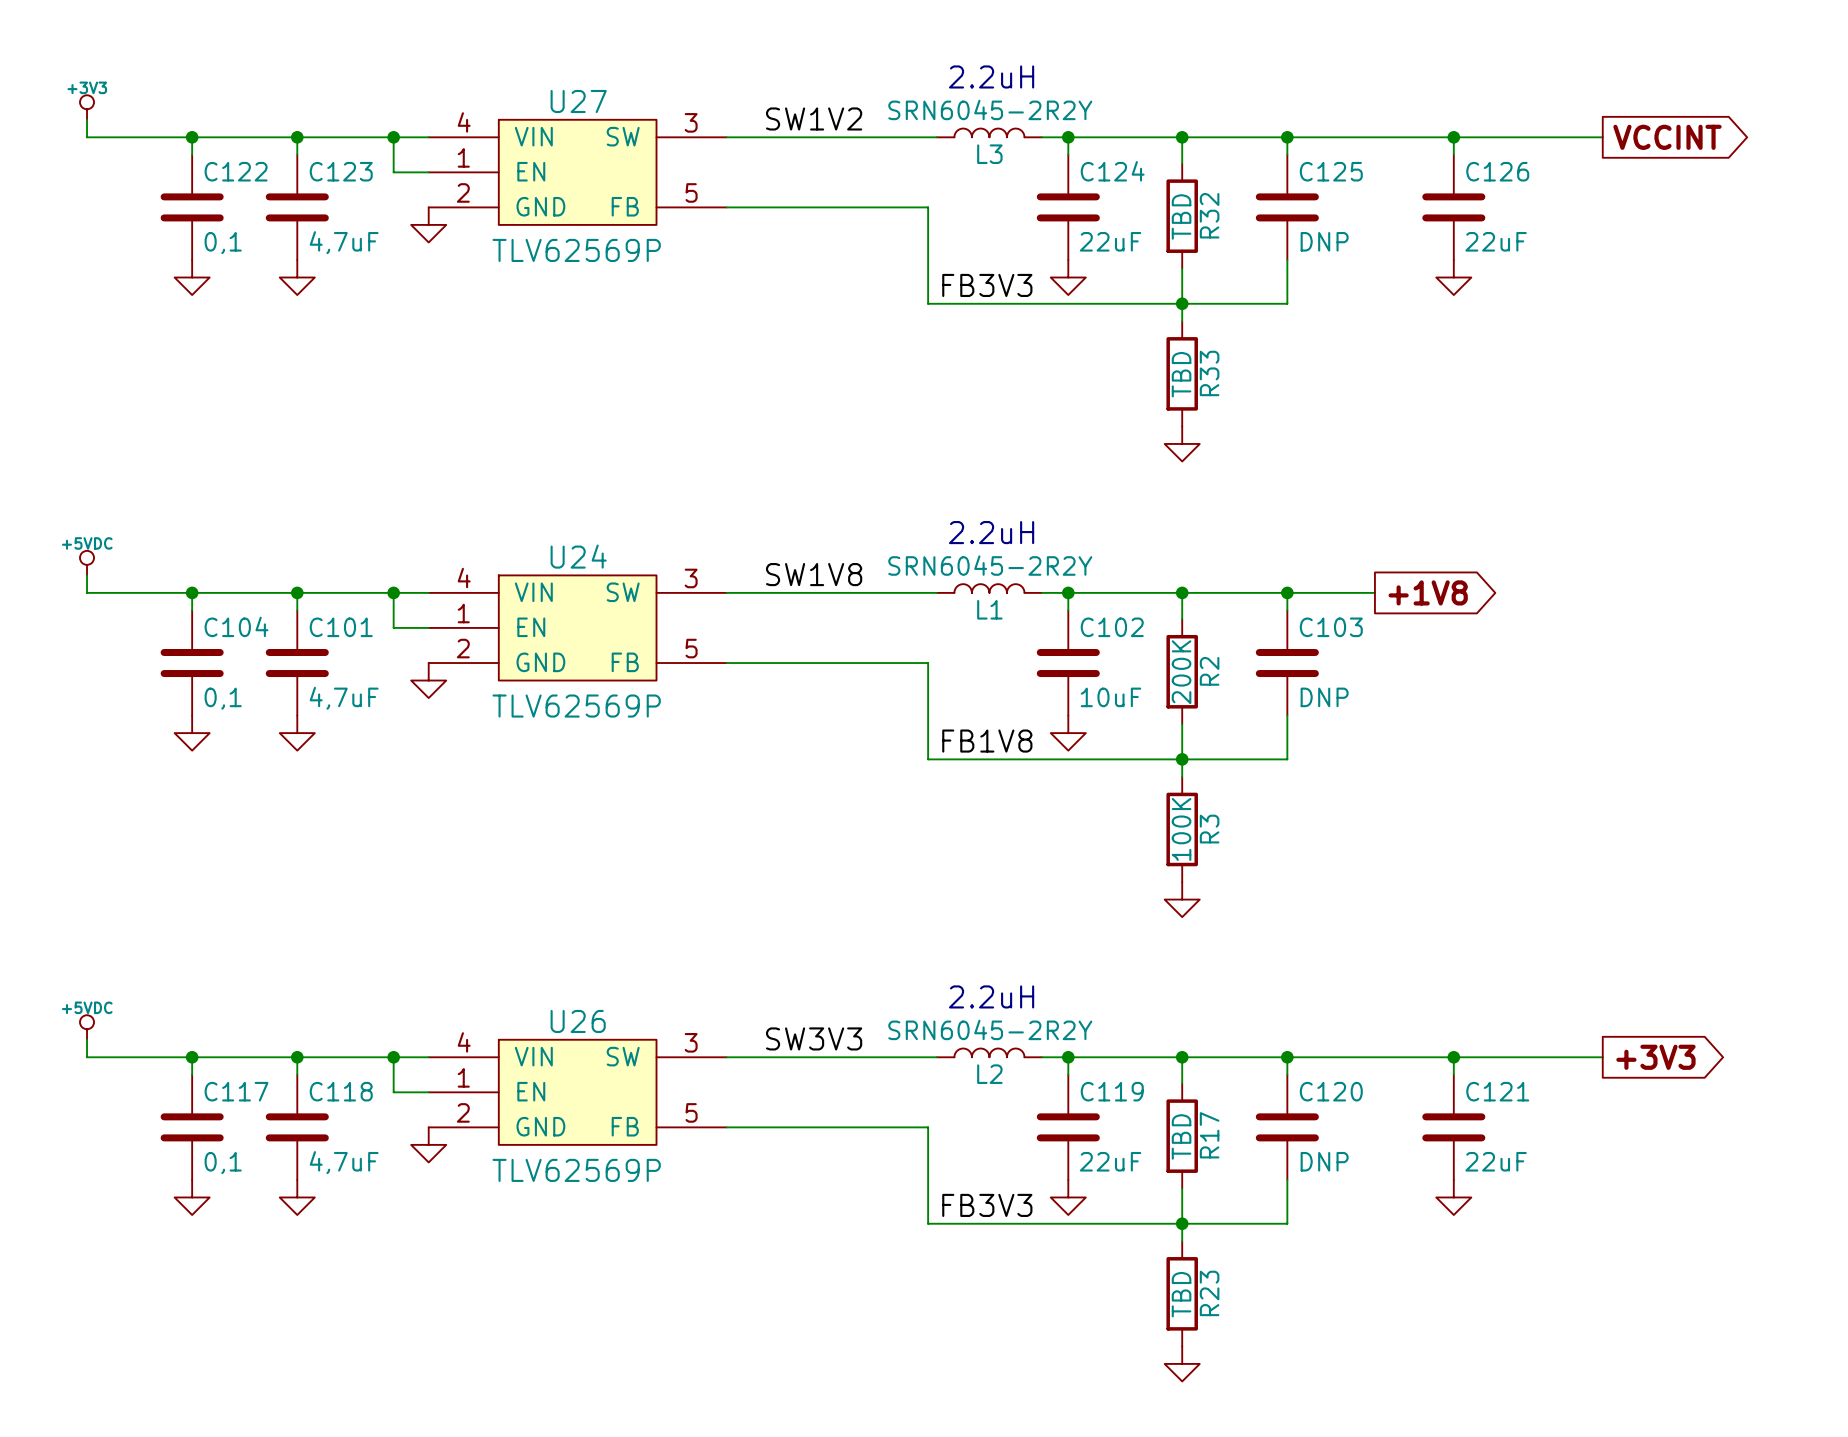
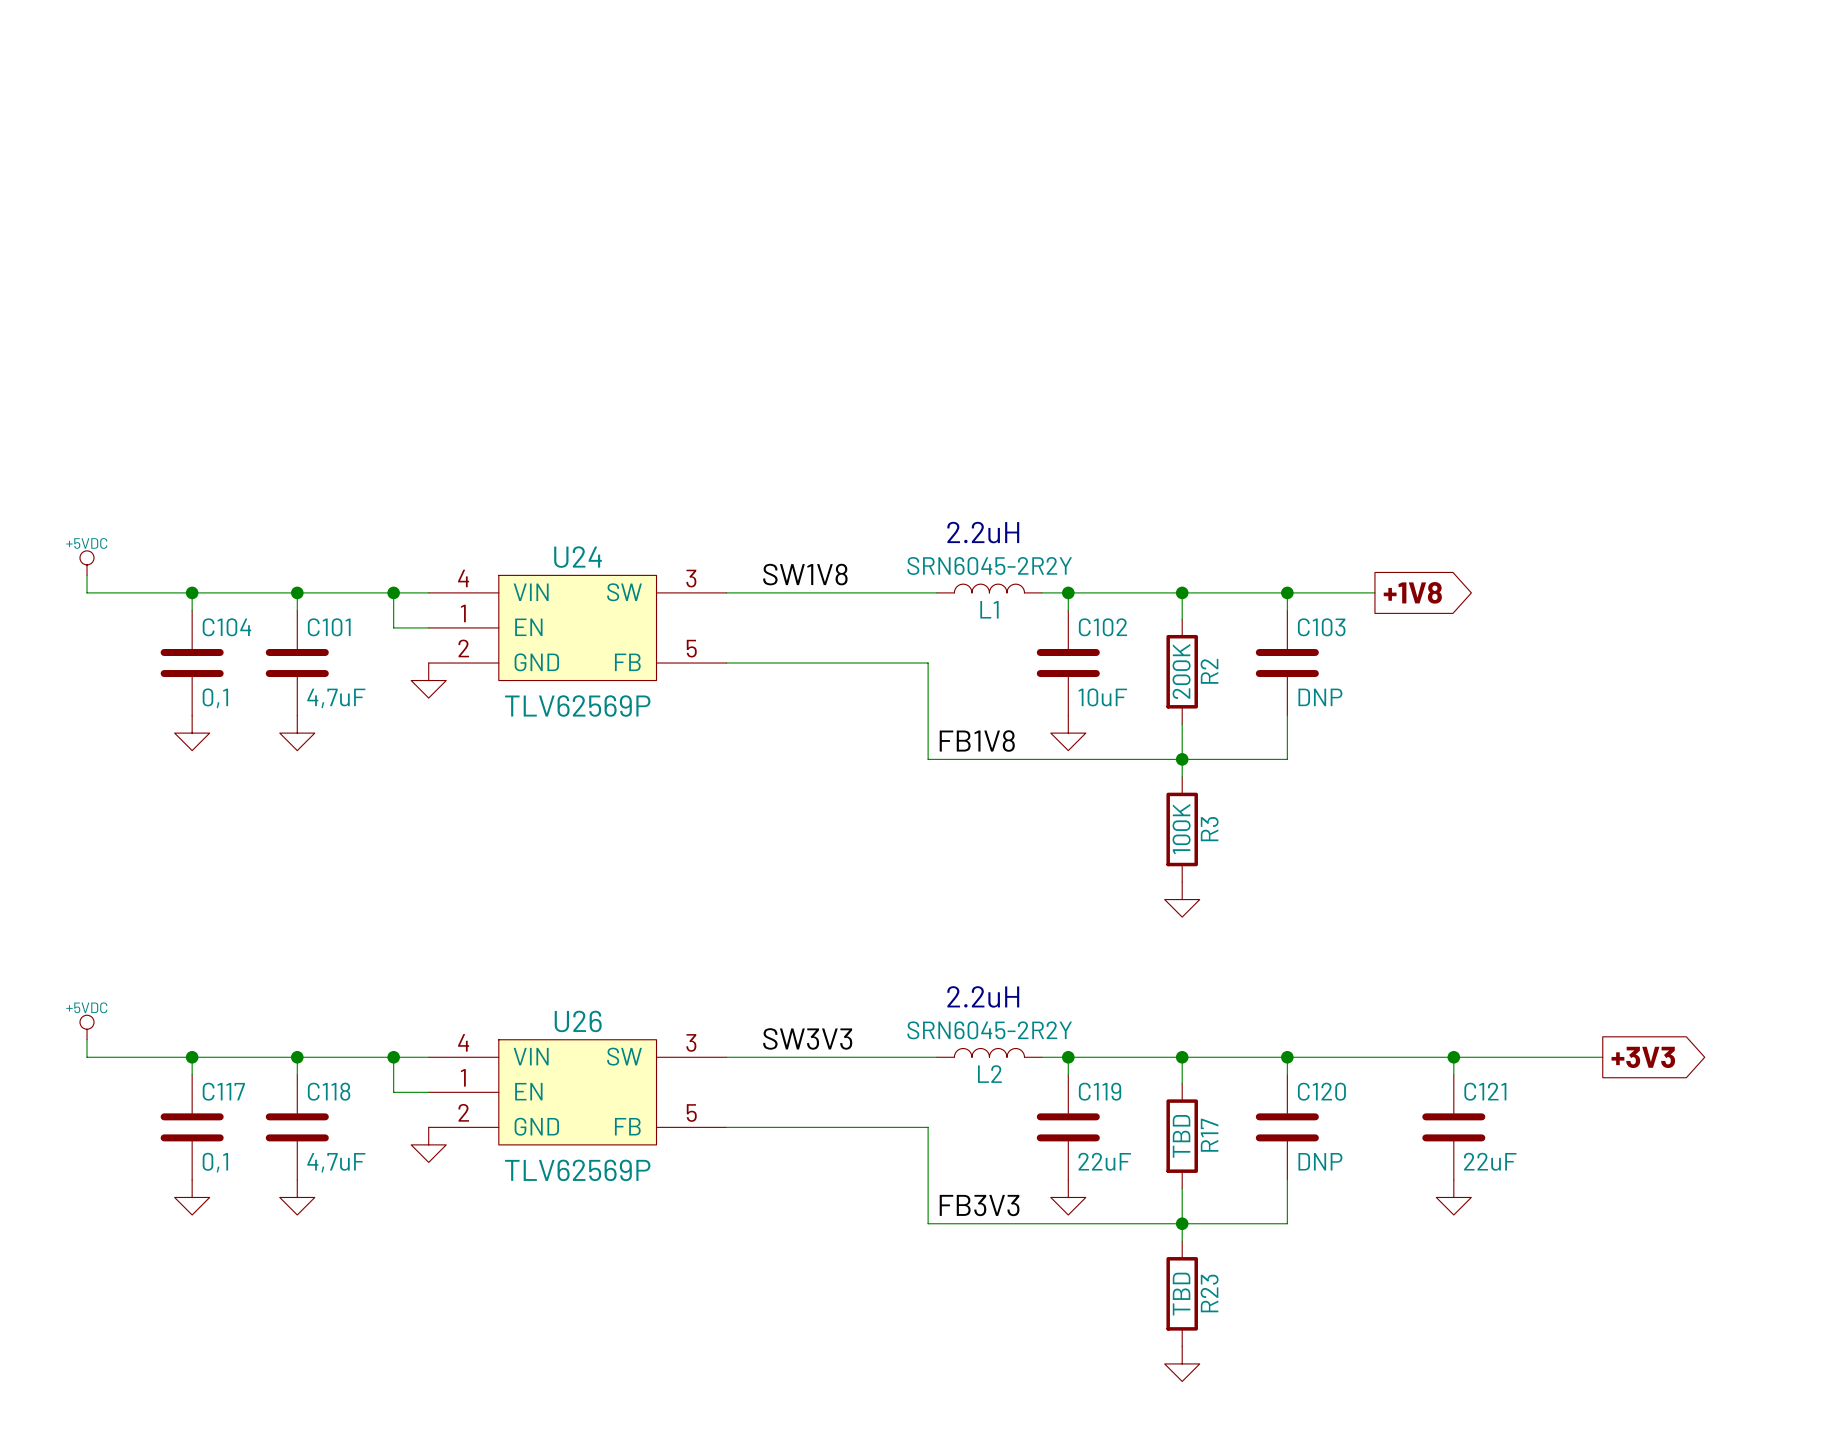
text: 2.2uH (991, 76) -> none
power symbol: +3V3 (87, 107) -> none
label: SW1V2 (814, 118) -> none
wire: (87, 119) (87, 137) (428, 137) -> none
L3: SRN6045-2R2Y (989, 132) -> none
wire: (192, 137) (192, 154) -> none
junction: (192, 137) -> none
wire: (297, 137) (297, 154) -> none
junction: (297, 137) -> none
wire: (393, 137) (393, 172) (428, 172) -> none
junction: (393, 137) -> none
wire: (726, 137) (936, 137) -> none
wire: (1042, 137) (1602, 137) -> none
wire: (1068, 137) (1068, 154) -> none
junction: (1068, 137) -> none
wire: (1182, 137) (1182, 163) -> none
junction: (1182, 137) -> none
wire: (1287, 137) (1287, 154) -> none
junction: (1287, 137) -> none
wire: (1453, 137) (1453, 154) -> none
junction: (1453, 137) -> none
global label: VCCINT (1667, 137) -> none
U27: TLV62569P (577, 172) -> none
C122: 0,1 (192, 207) -> none
C123: 4,7uF (297, 207) -> none
wire: (726, 207) (928, 207) (928, 303) (1287, 303) (1287, 259) -> none
C124: 22uF (1068, 207) -> none
C125: DNP (1287, 207) -> none
C126: 22uF (1453, 207) -> none
R32: TBD (1182, 216) -> none
power symbol: (428, 224) -> none
wire: (1182, 268) (1182, 321) -> none
power symbol: (192, 277) -> none
power symbol: (297, 277) -> none
power symbol: (1068, 277) -> none
power symbol: (1453, 277) -> none
label: FB3V3 (987, 285) -> none
junction: (1182, 303) -> none
R33: TBD (1182, 373) -> none
power symbol: (1182, 443) -> none

